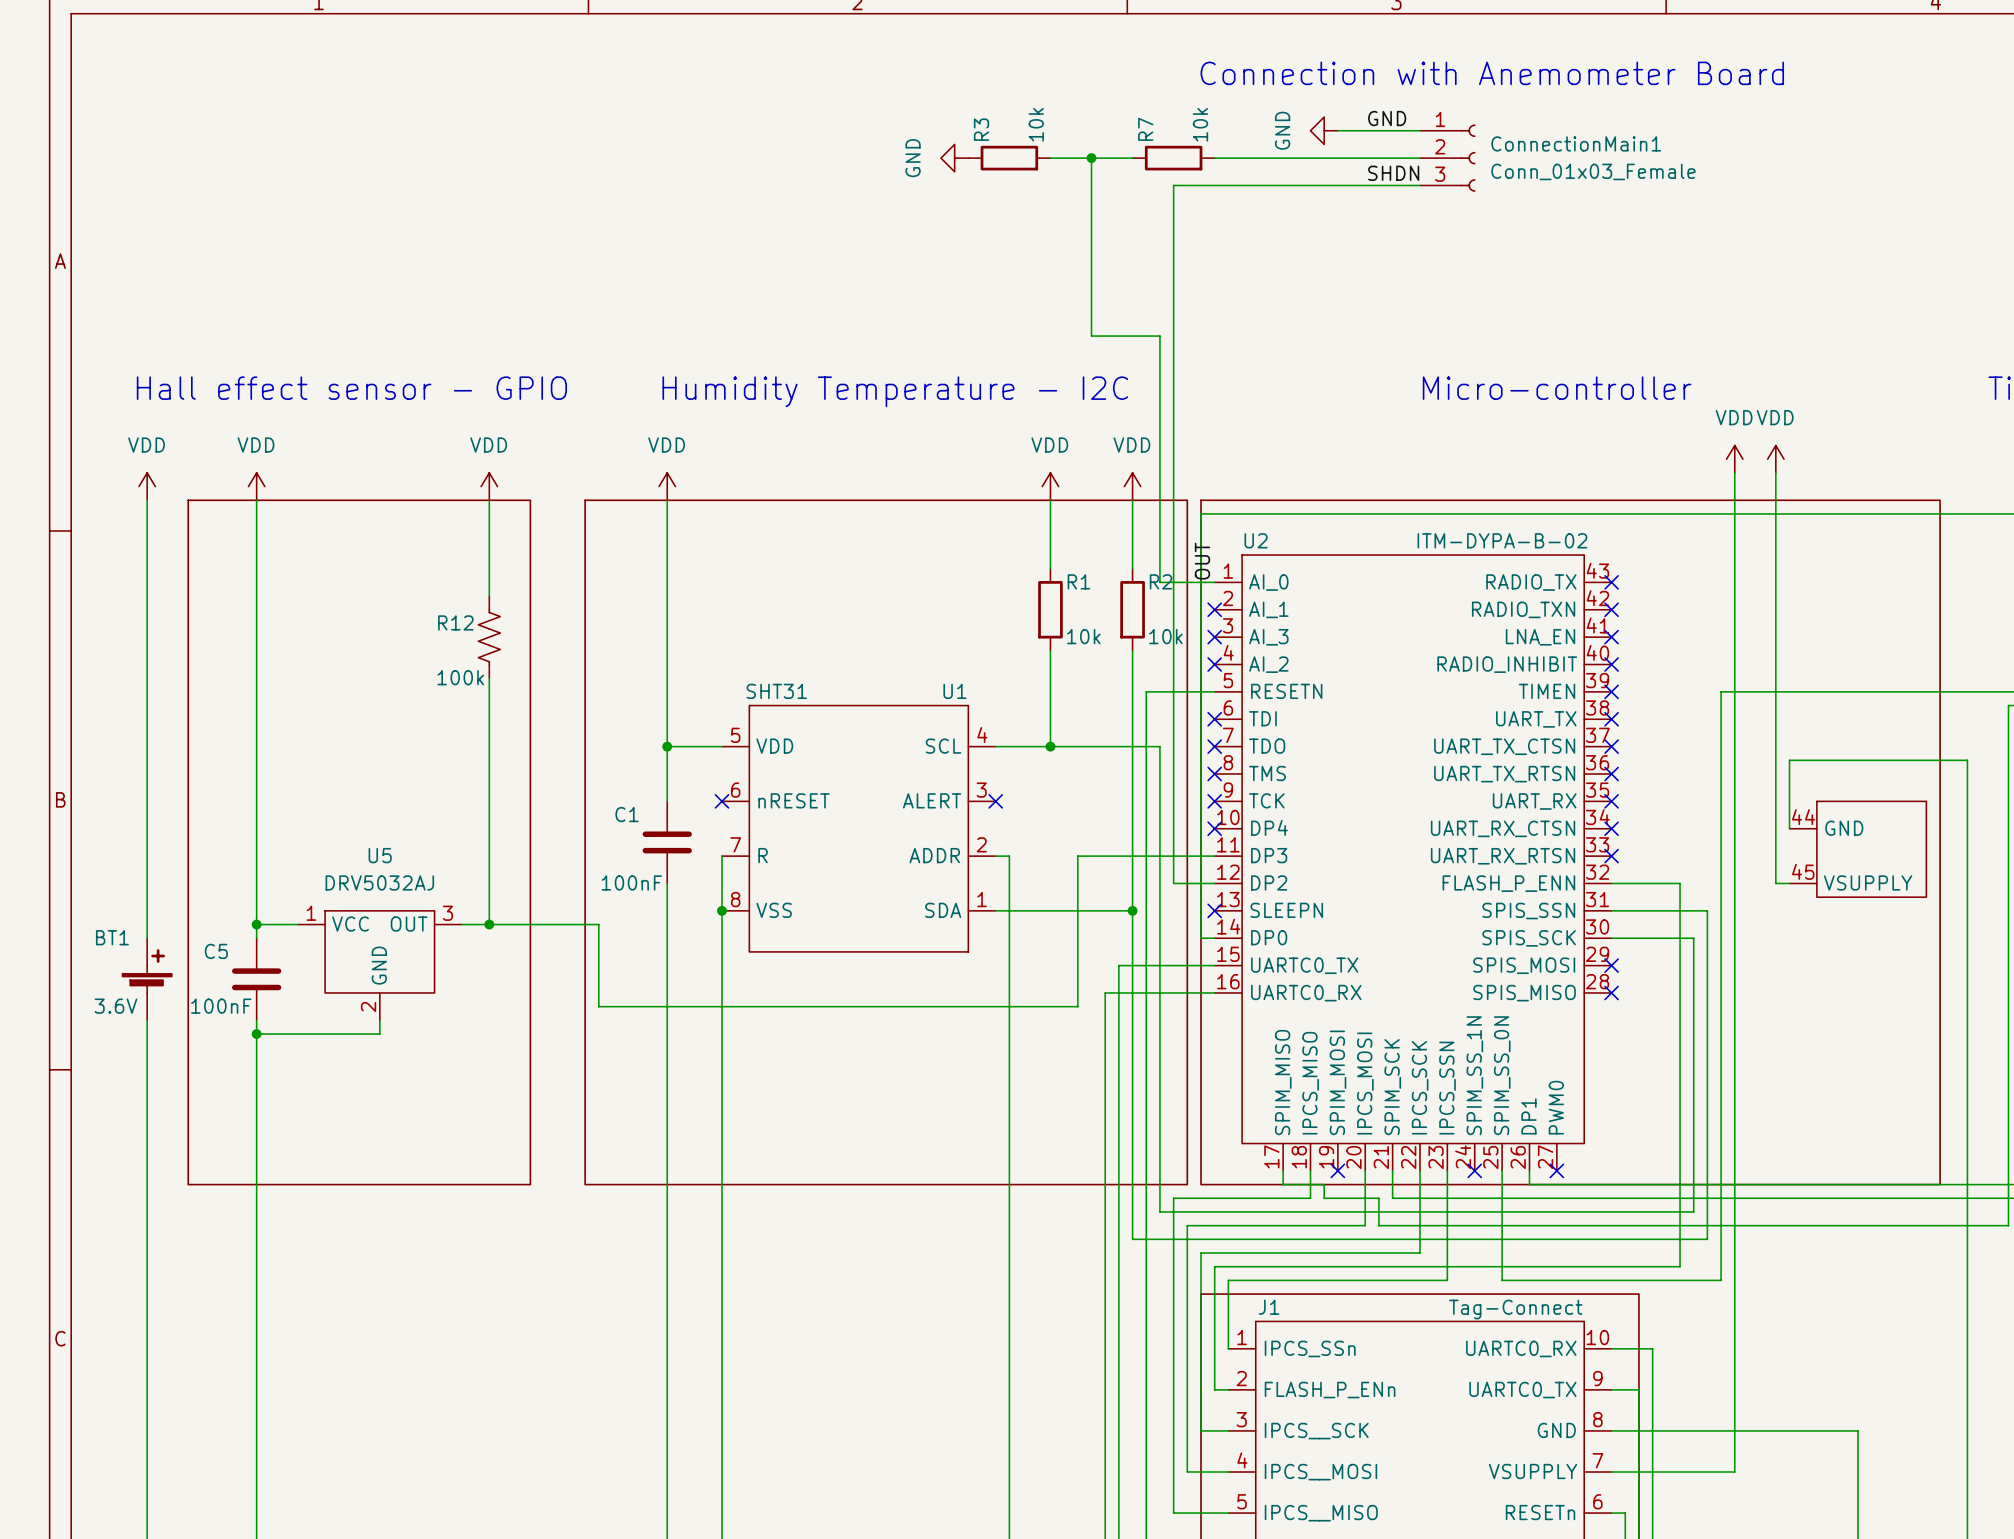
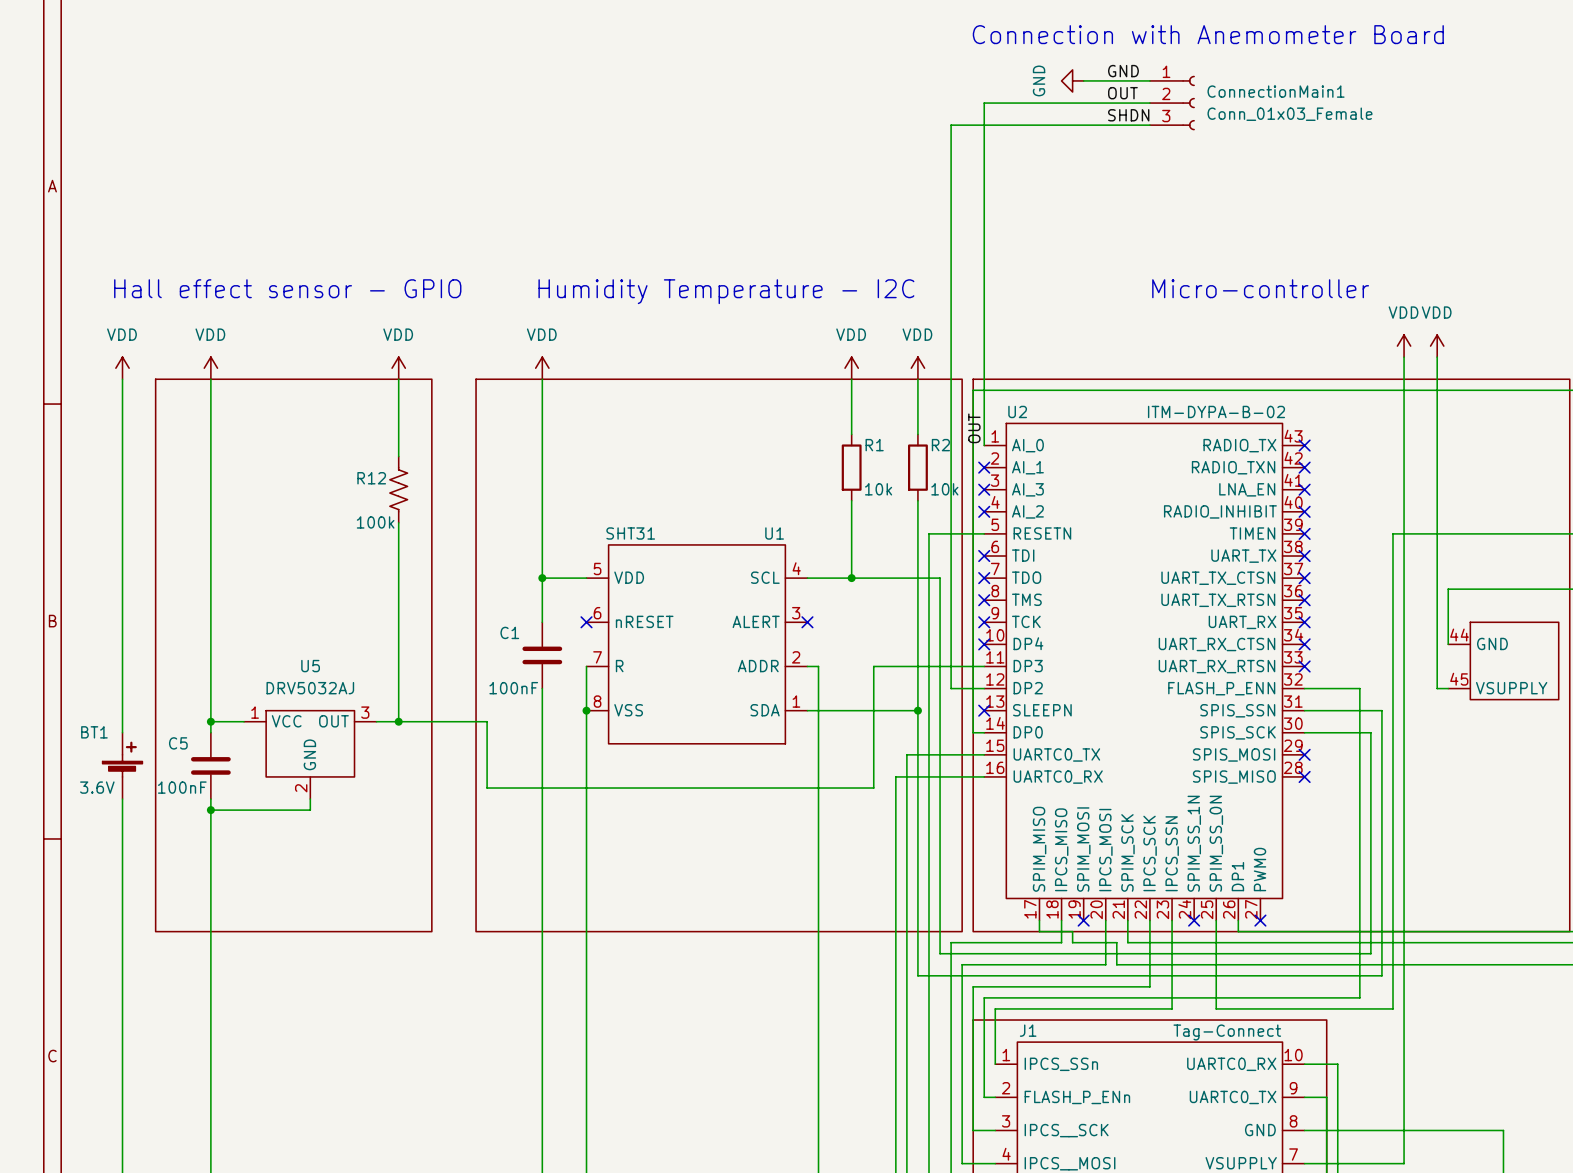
label: none -> OUT (1122, 93)
power symbol: GND (954, 158) -> none
R3: 10k (1009, 158) -> none
wire: (1050, 158) (1132, 158) -> none
wire: (1091, 158) (1091, 336) (1159, 336) (1159, 582) (1214, 582) -> (984, 103) (984, 445)
junction: (1091, 158) -> none
R7: 10k (1173, 158) -> none

